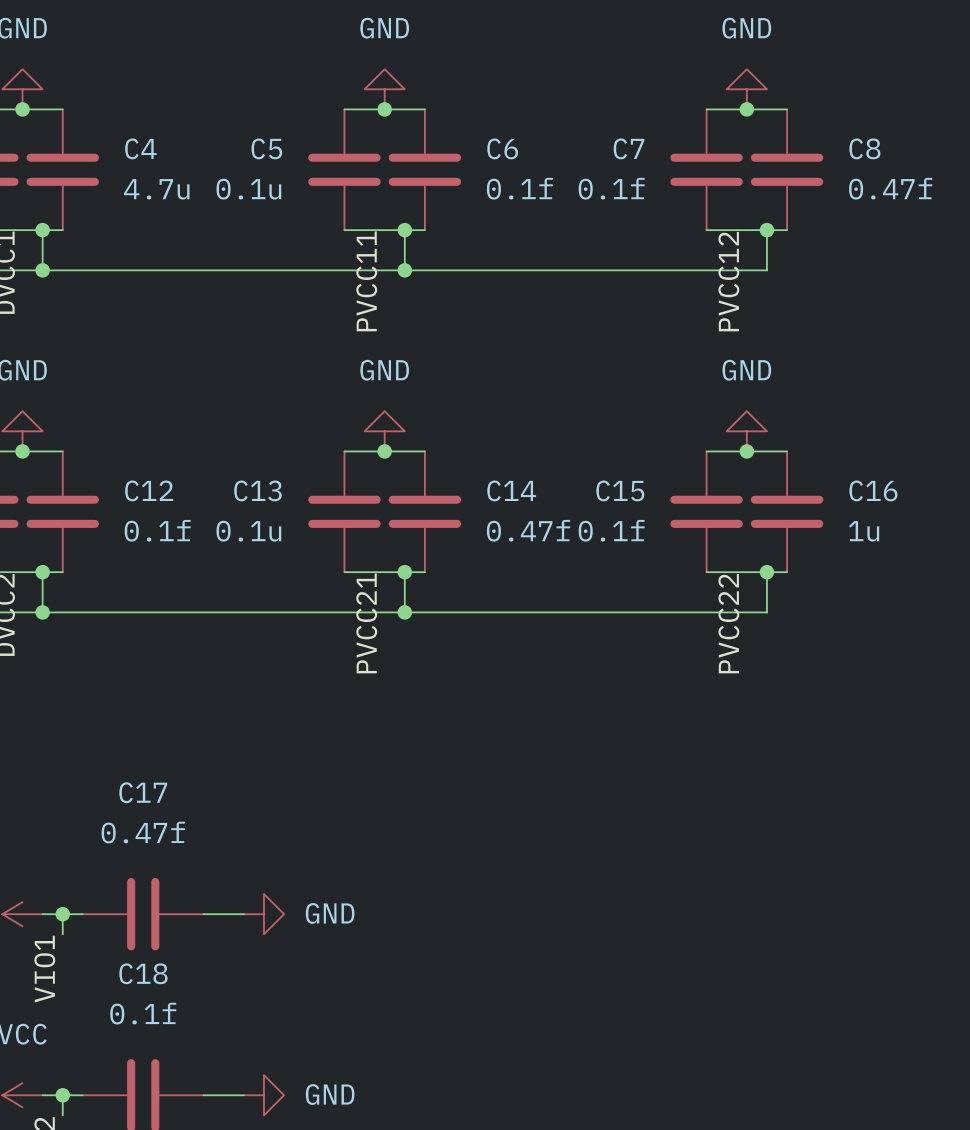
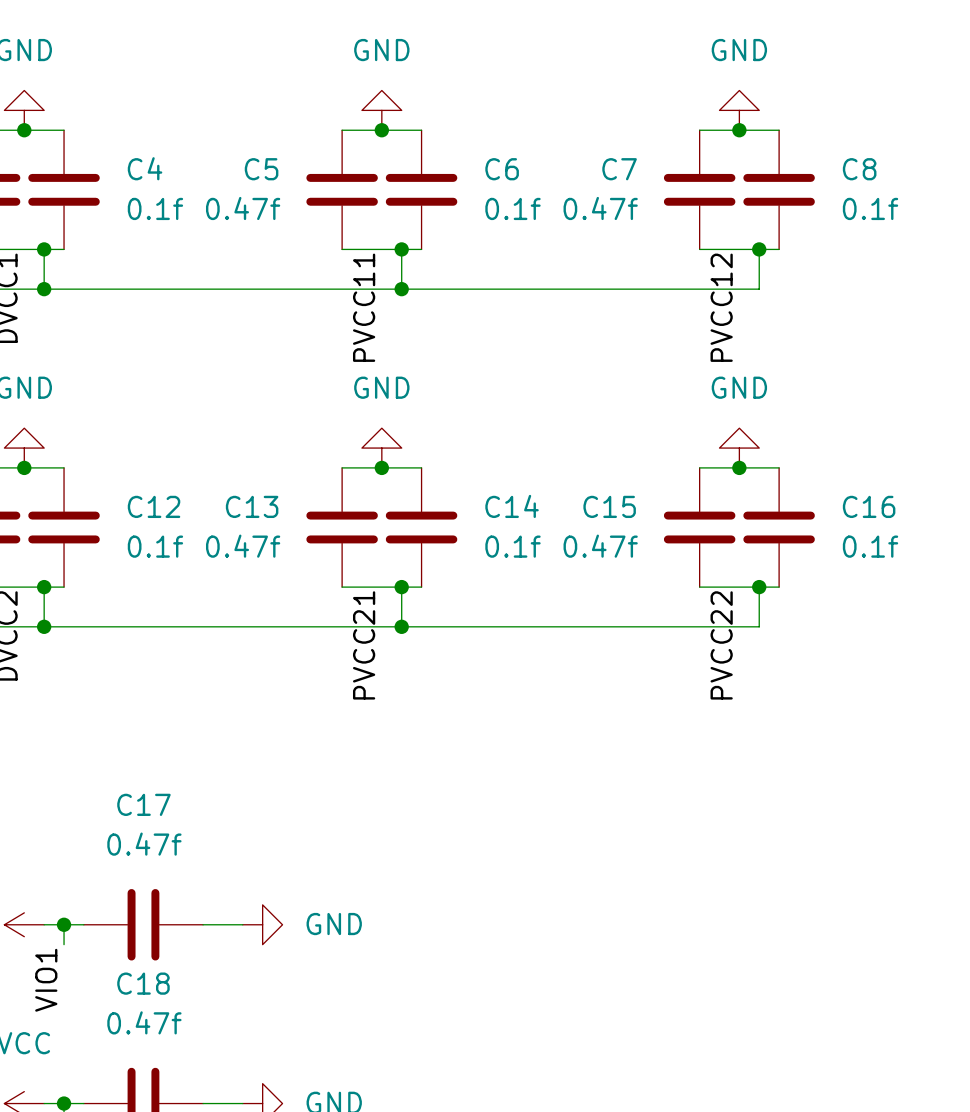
C7 value: 0.1f (611, 188) -> 0.47f (600, 208)
C8 value: 0.47f (890, 188) -> 0.1f (870, 208)
C4 value: 4.7u (156, 189) -> 0.1f (155, 208)
C5 value: 0.1u (248, 189) -> 0.47f (243, 208)
C14 value: 0.47f (528, 530) -> 0.1f (512, 546)
C15 value: 0.1f (611, 530) -> 0.47f (600, 546)
C13 value: 0.1u (248, 531) -> 0.47f (243, 546)
C16 value: 1u (864, 531) -> 0.1f (870, 546)
C18 value: 0.1f (143, 1013) -> 0.47f (144, 1022)

